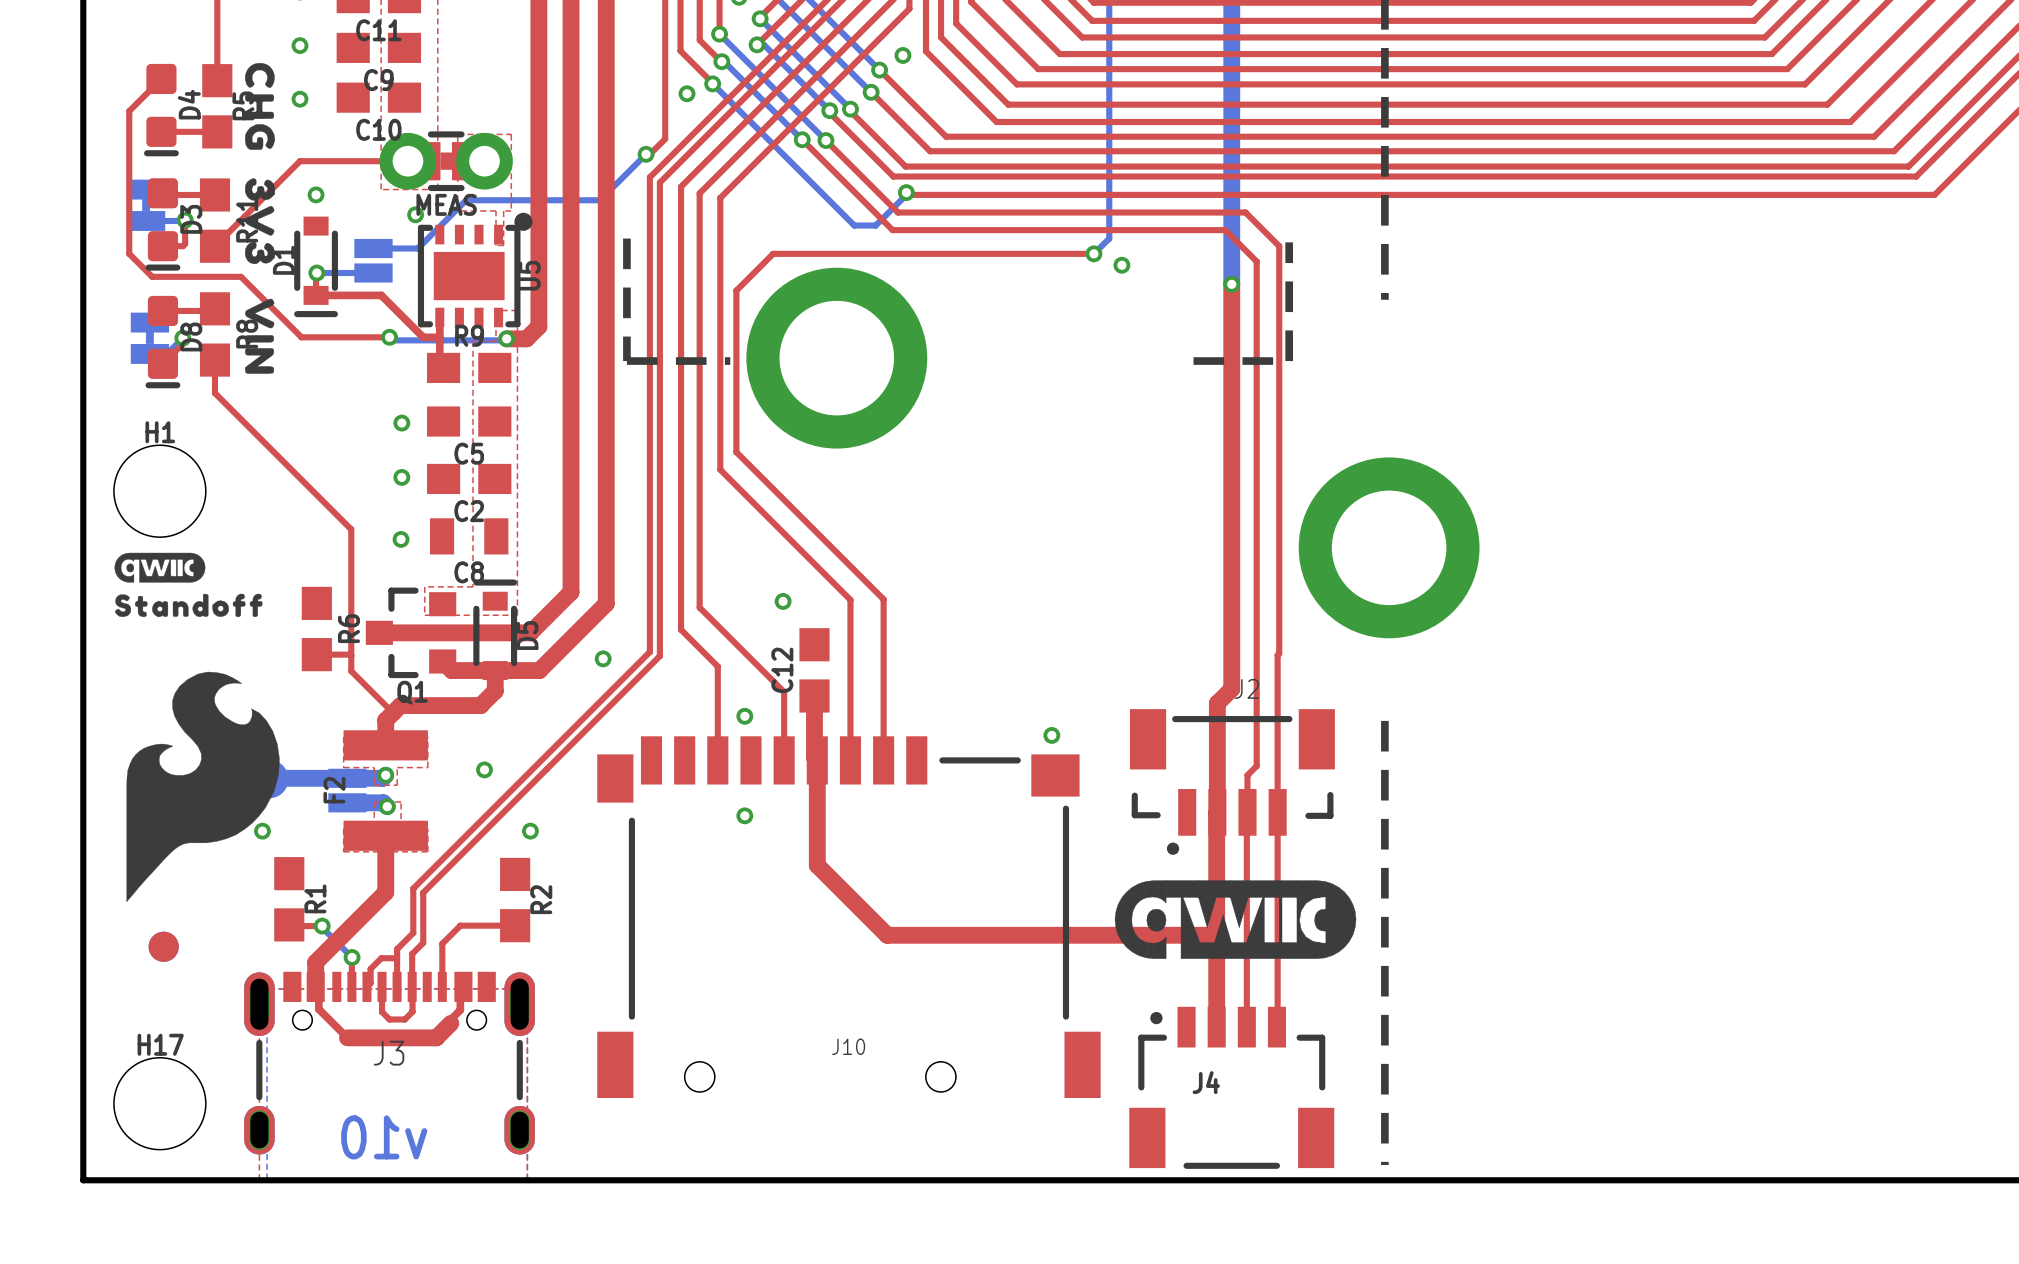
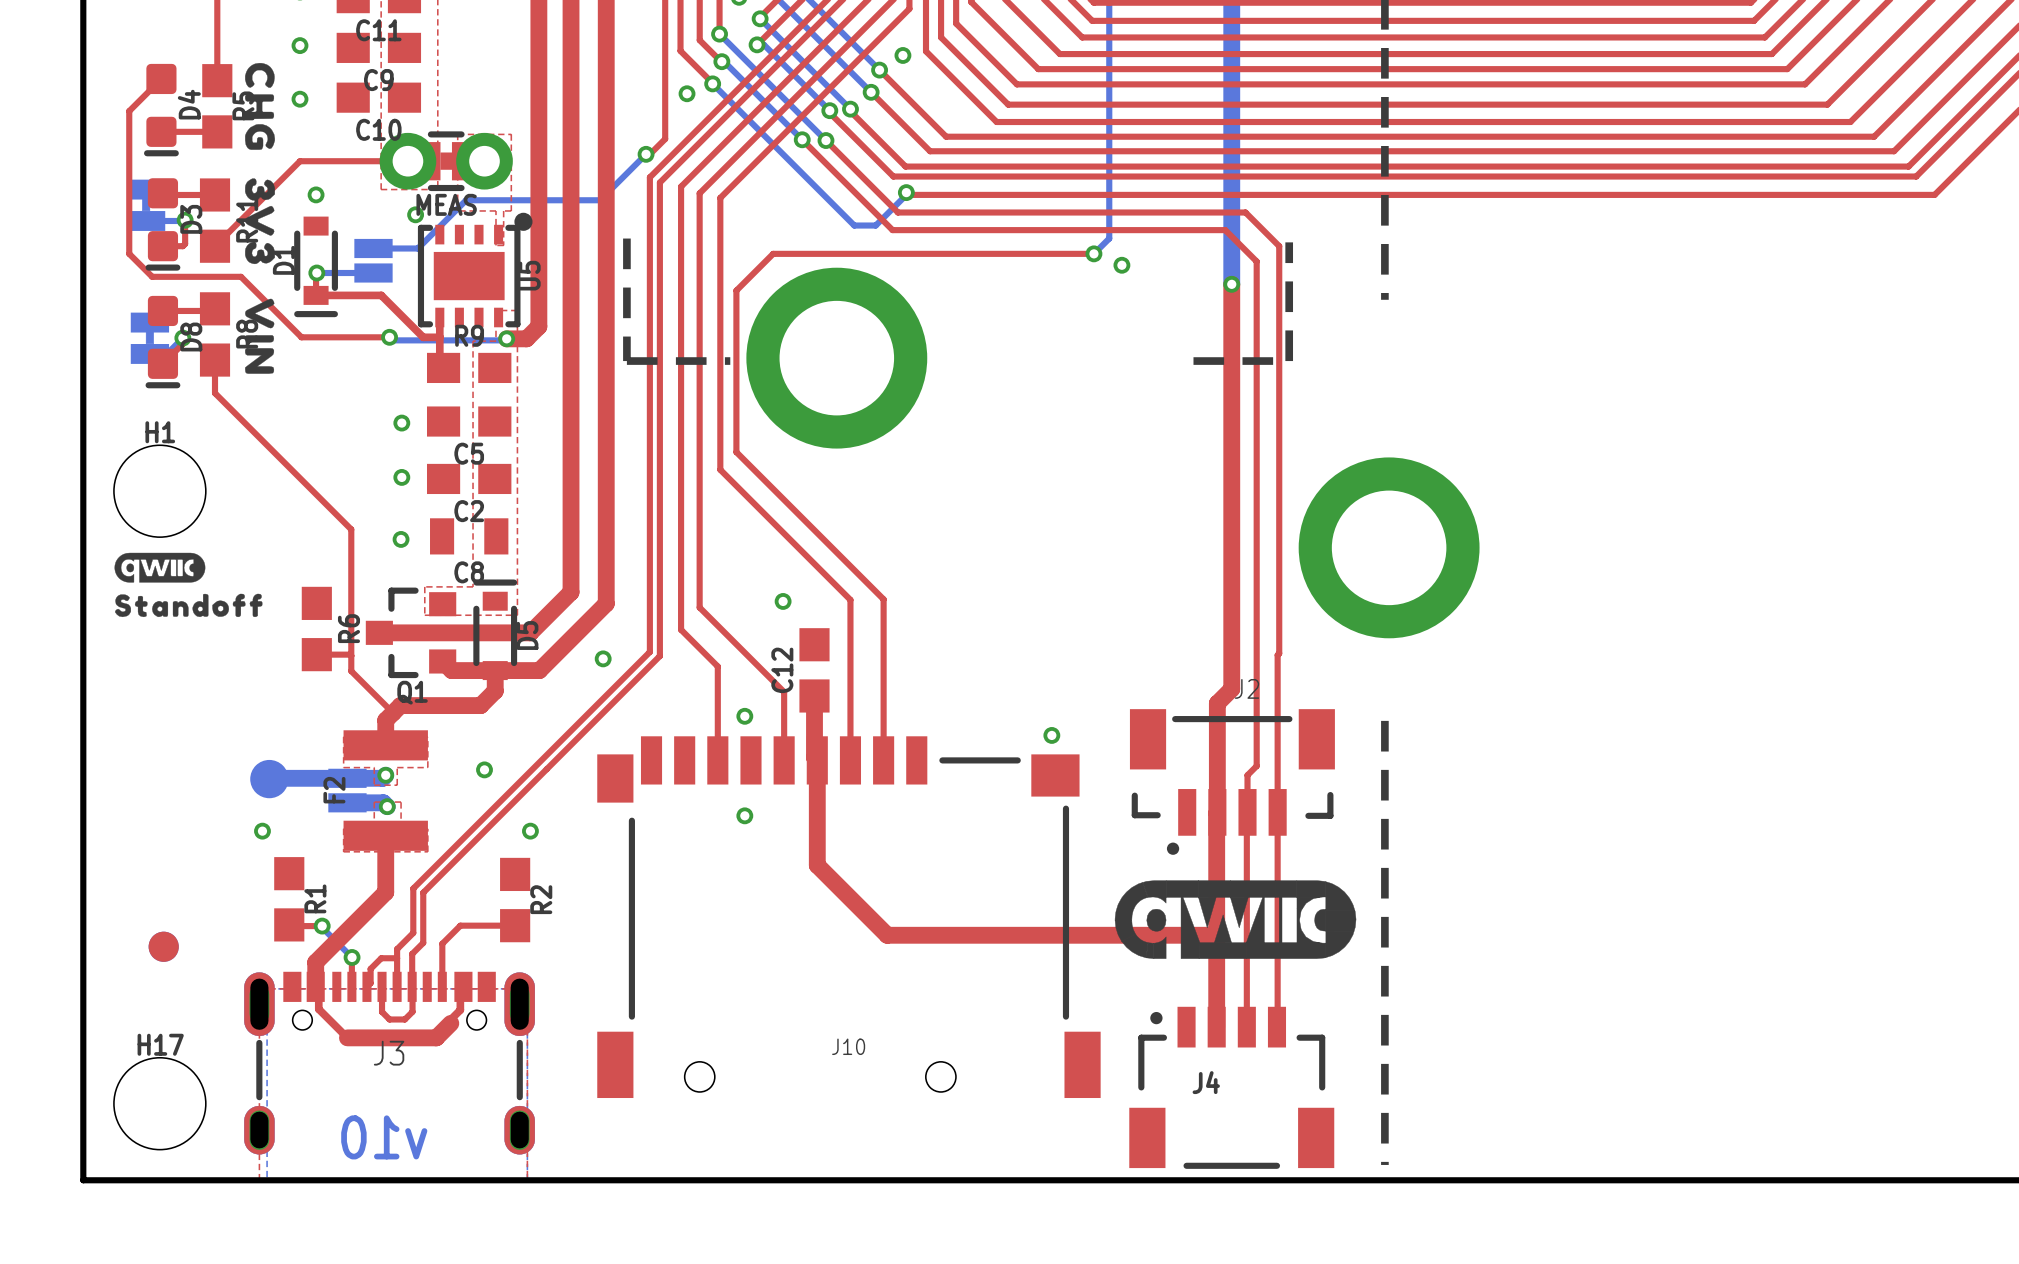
drawing: [126, 671, 280, 903] -> none

